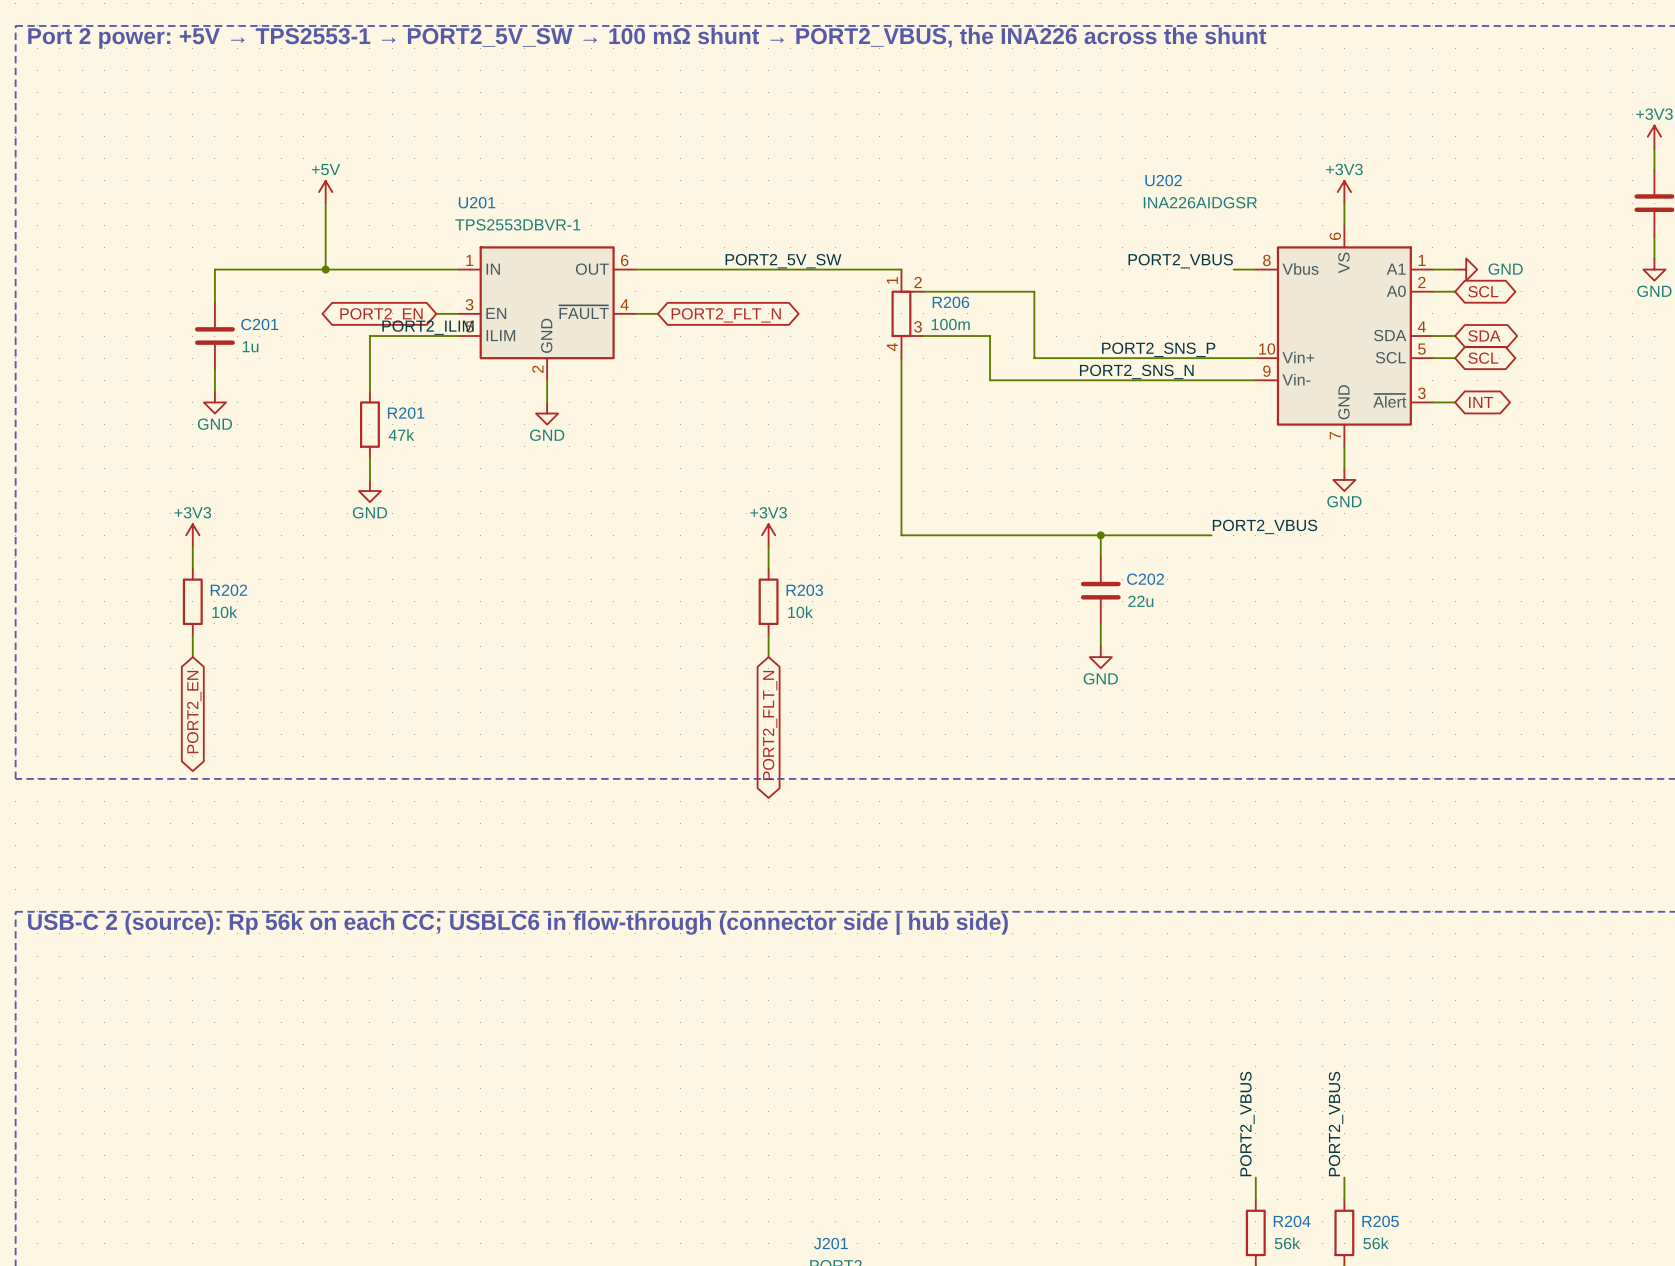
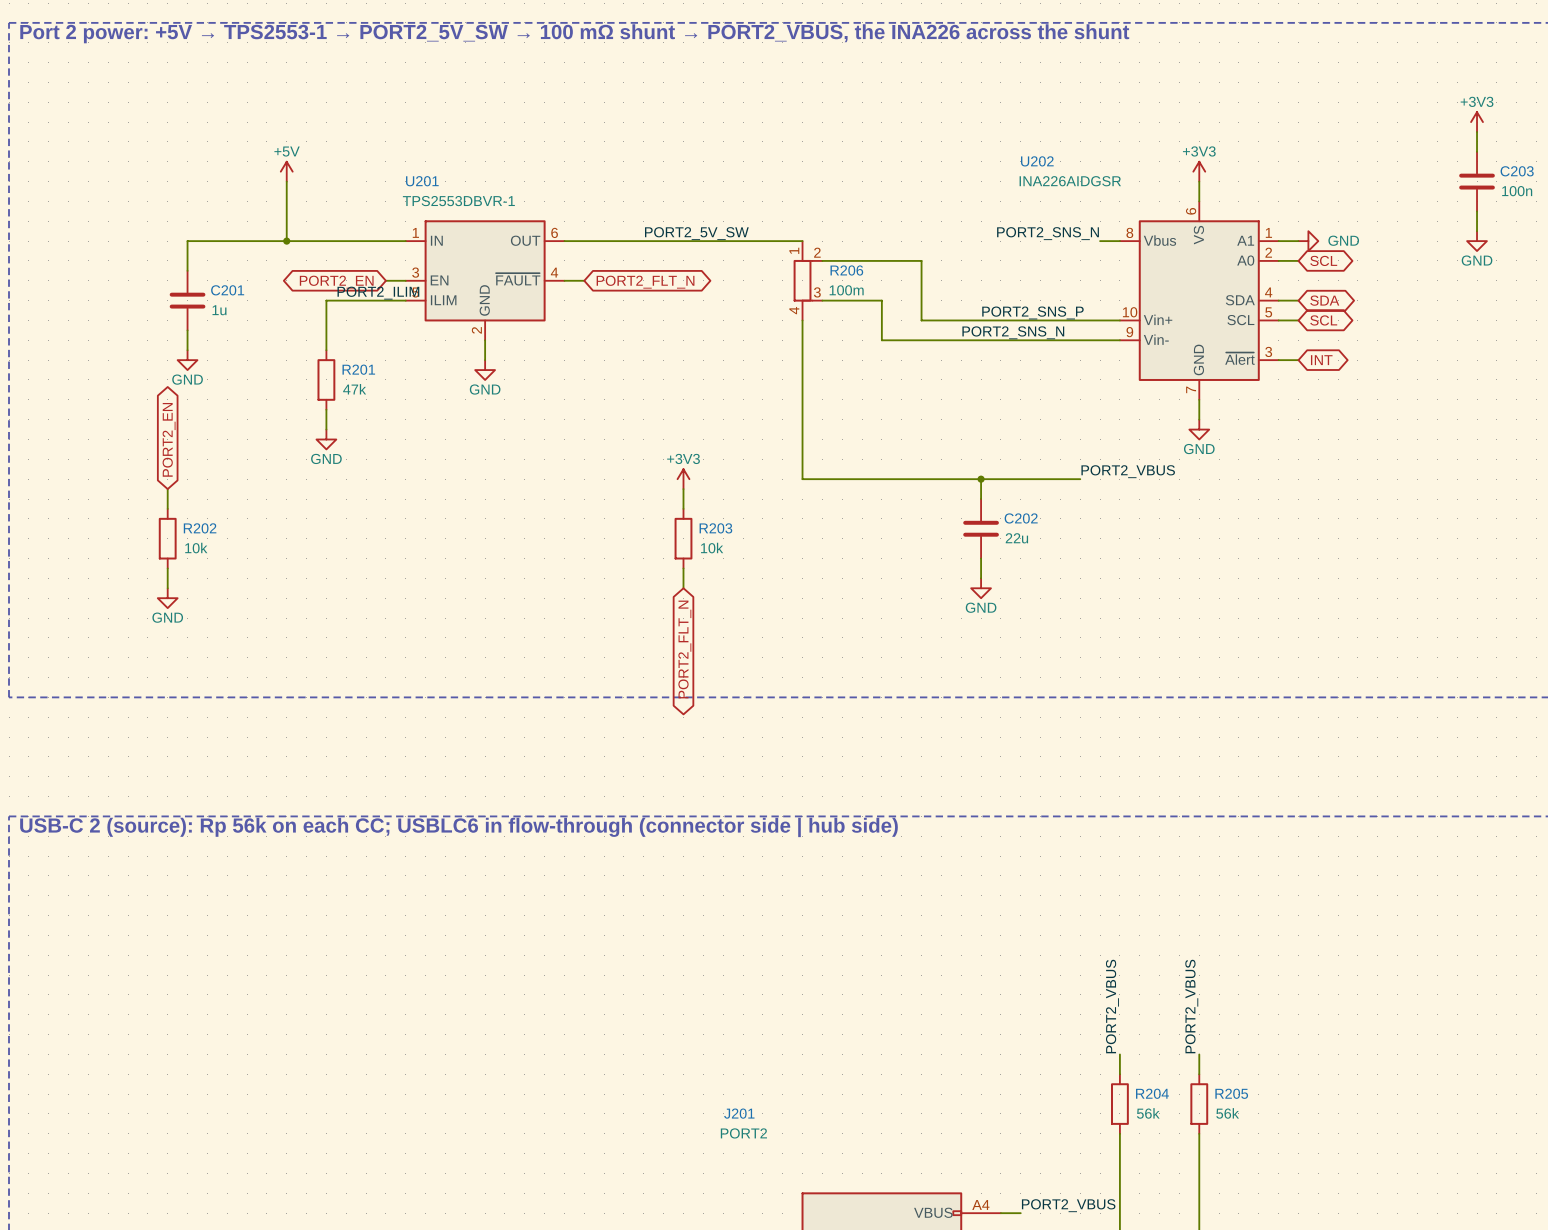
label: PORT2_VBUS (1180, 261) -> PORT2_SNS_N (1048, 233)
power symbol: +3V3 (192, 535) -> none
power symbol: none -> GND (167, 598)
global label rotation: 0° (194, 712) -> 180° (169, 439)
global label position: PORT2_EN (194, 712) -> PORT2_EN (169, 439)

